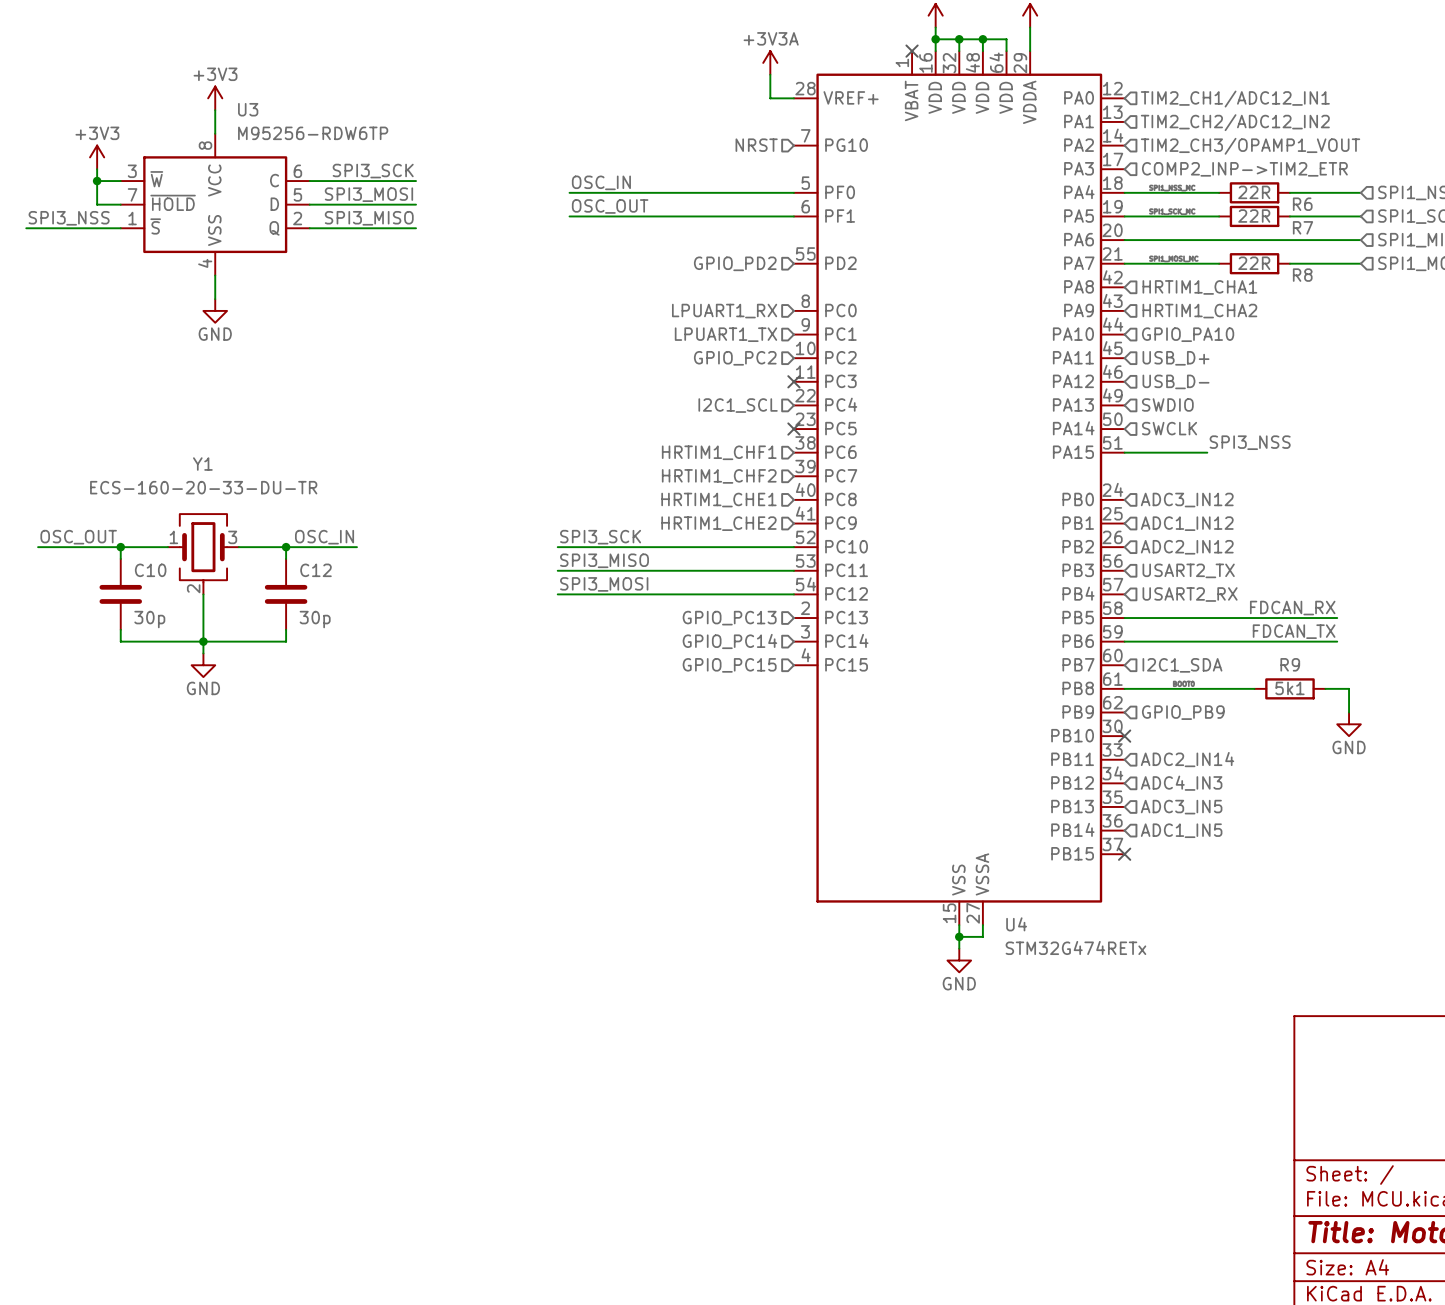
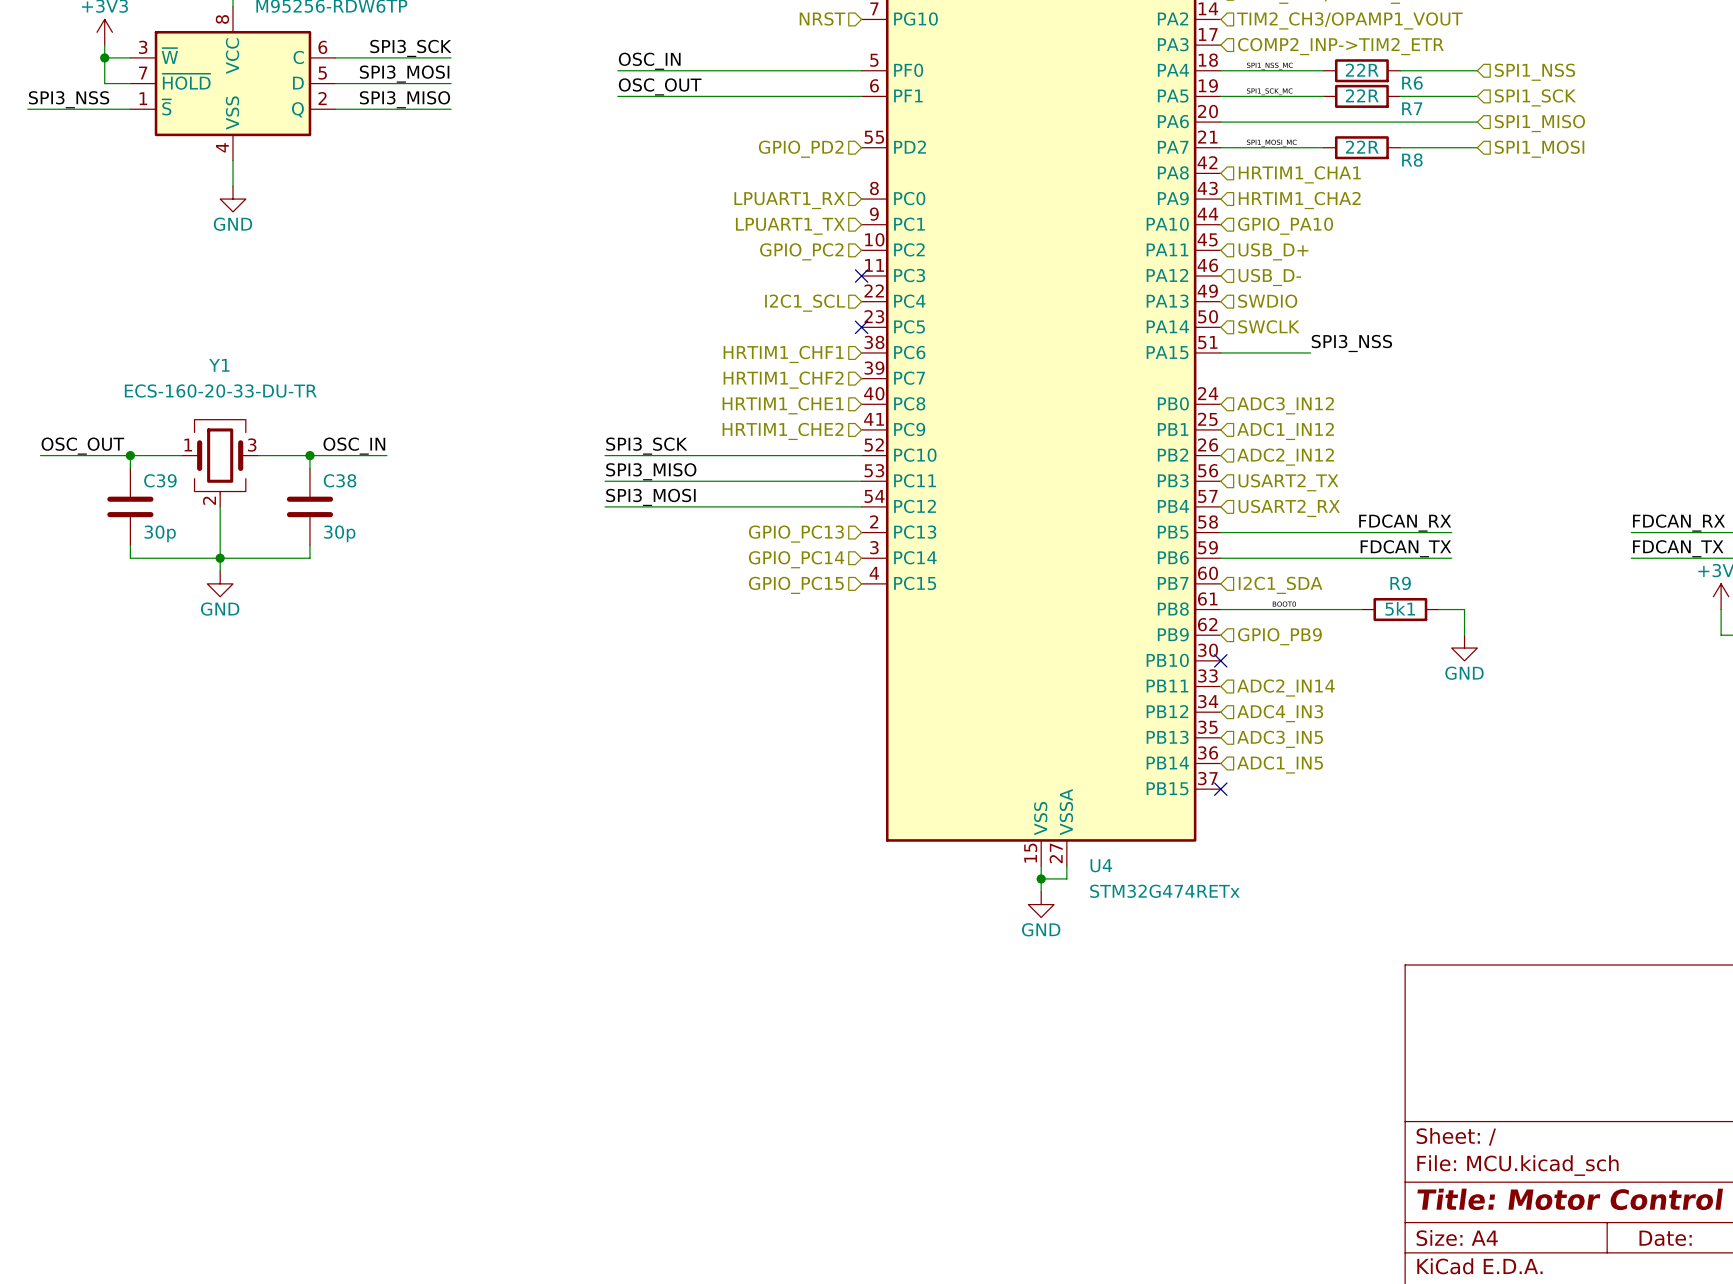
C10 name: C10 (150, 570) -> C39 (160, 480)
C12 name: C12 (315, 570) -> C38 (340, 480)

